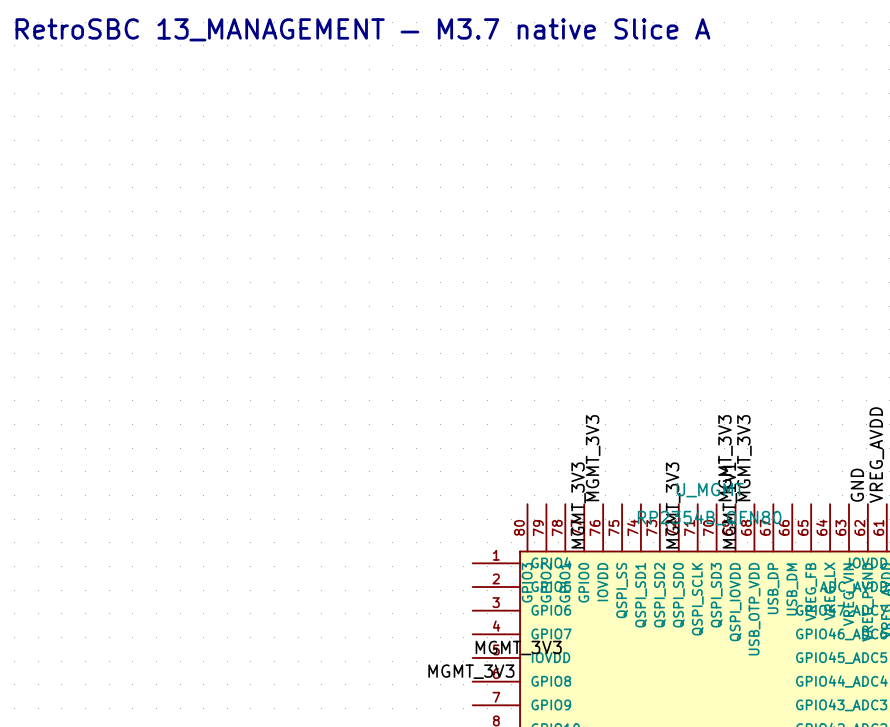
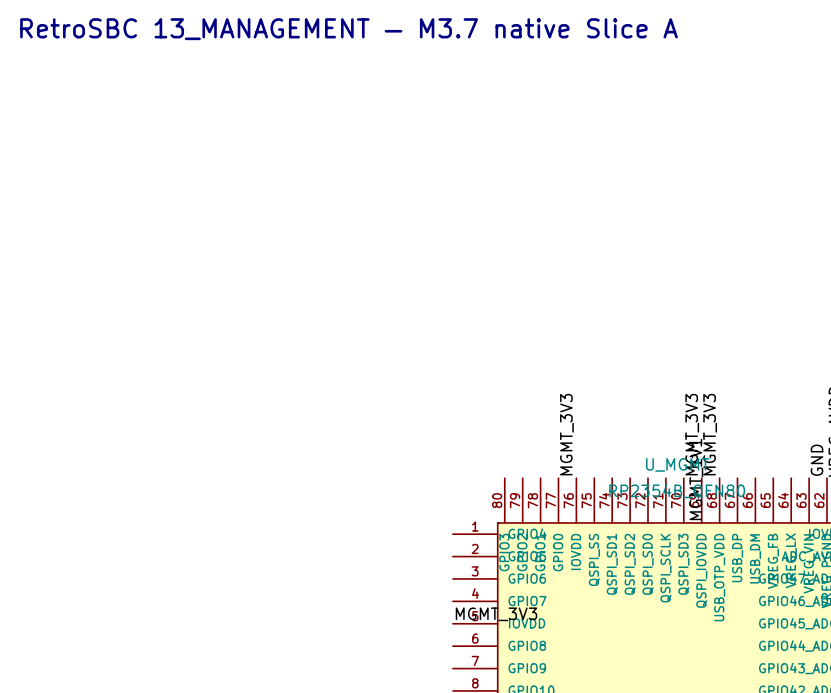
label: MGMT_3V3 (578, 505) -> none
label: MGMT_3V3 (673, 505) -> none
label: MGMT_3V3 (471, 671) -> none

